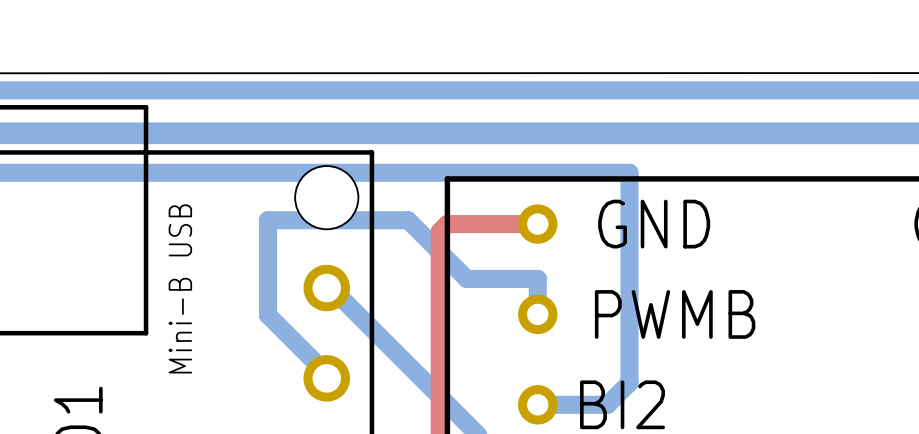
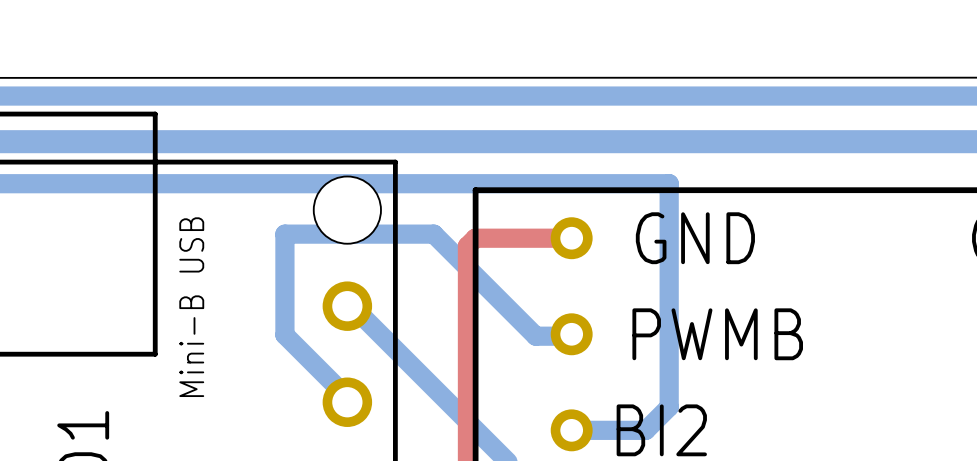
bottom track: (466, 278) (537, 278) (537, 314) -> (496, 296) (535, 336) (569, 336) (571, 334)

